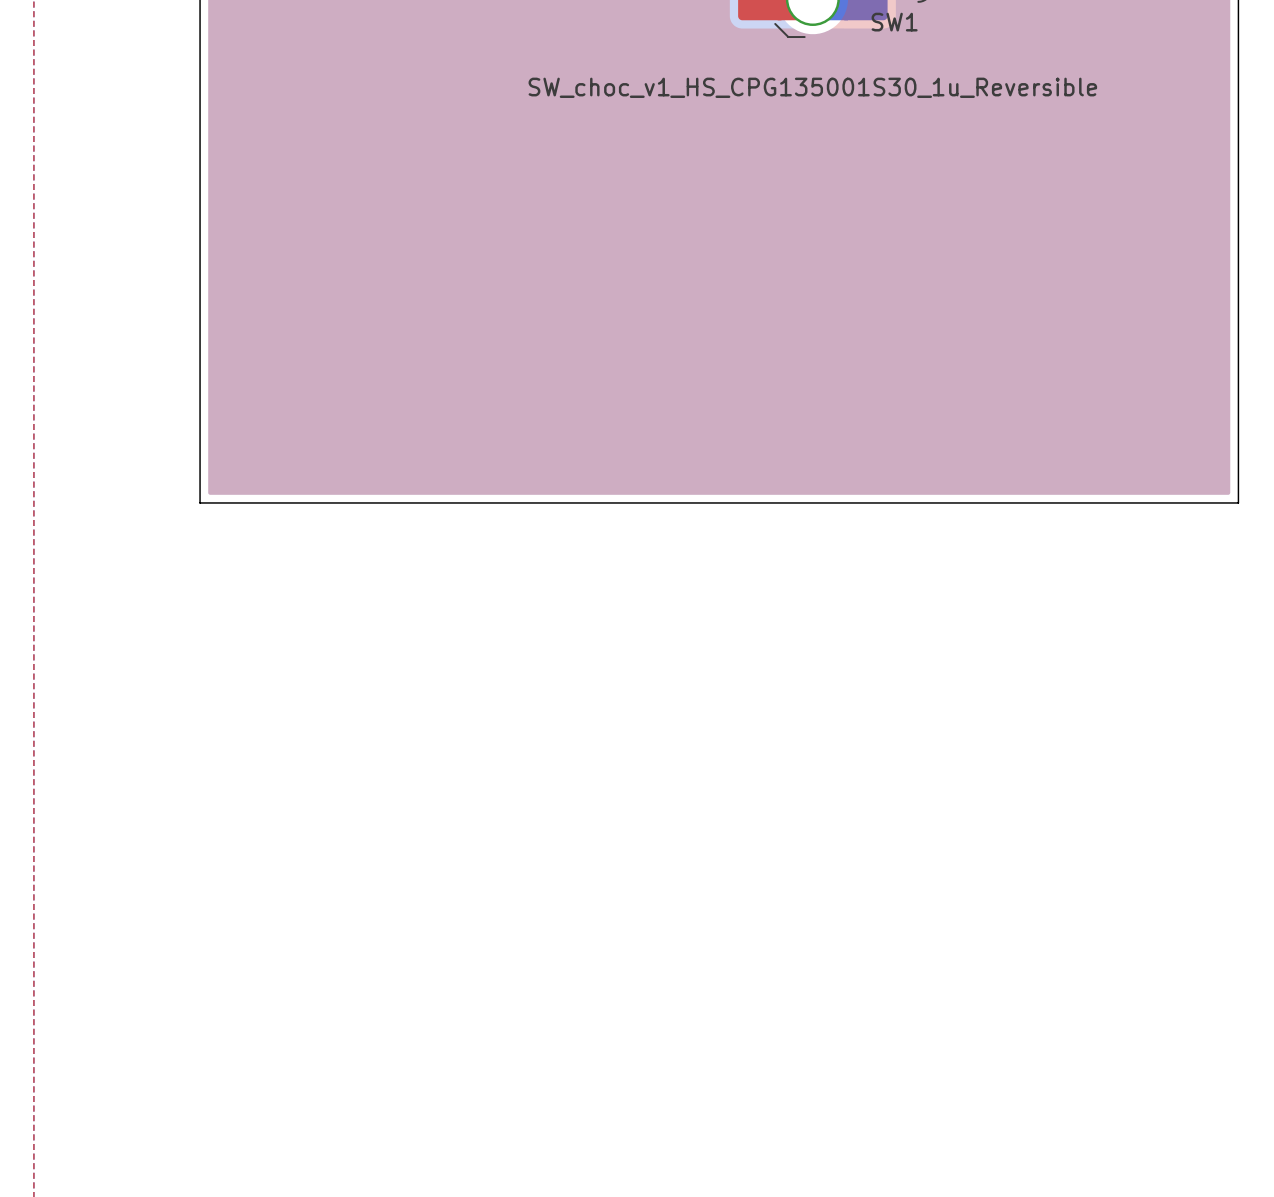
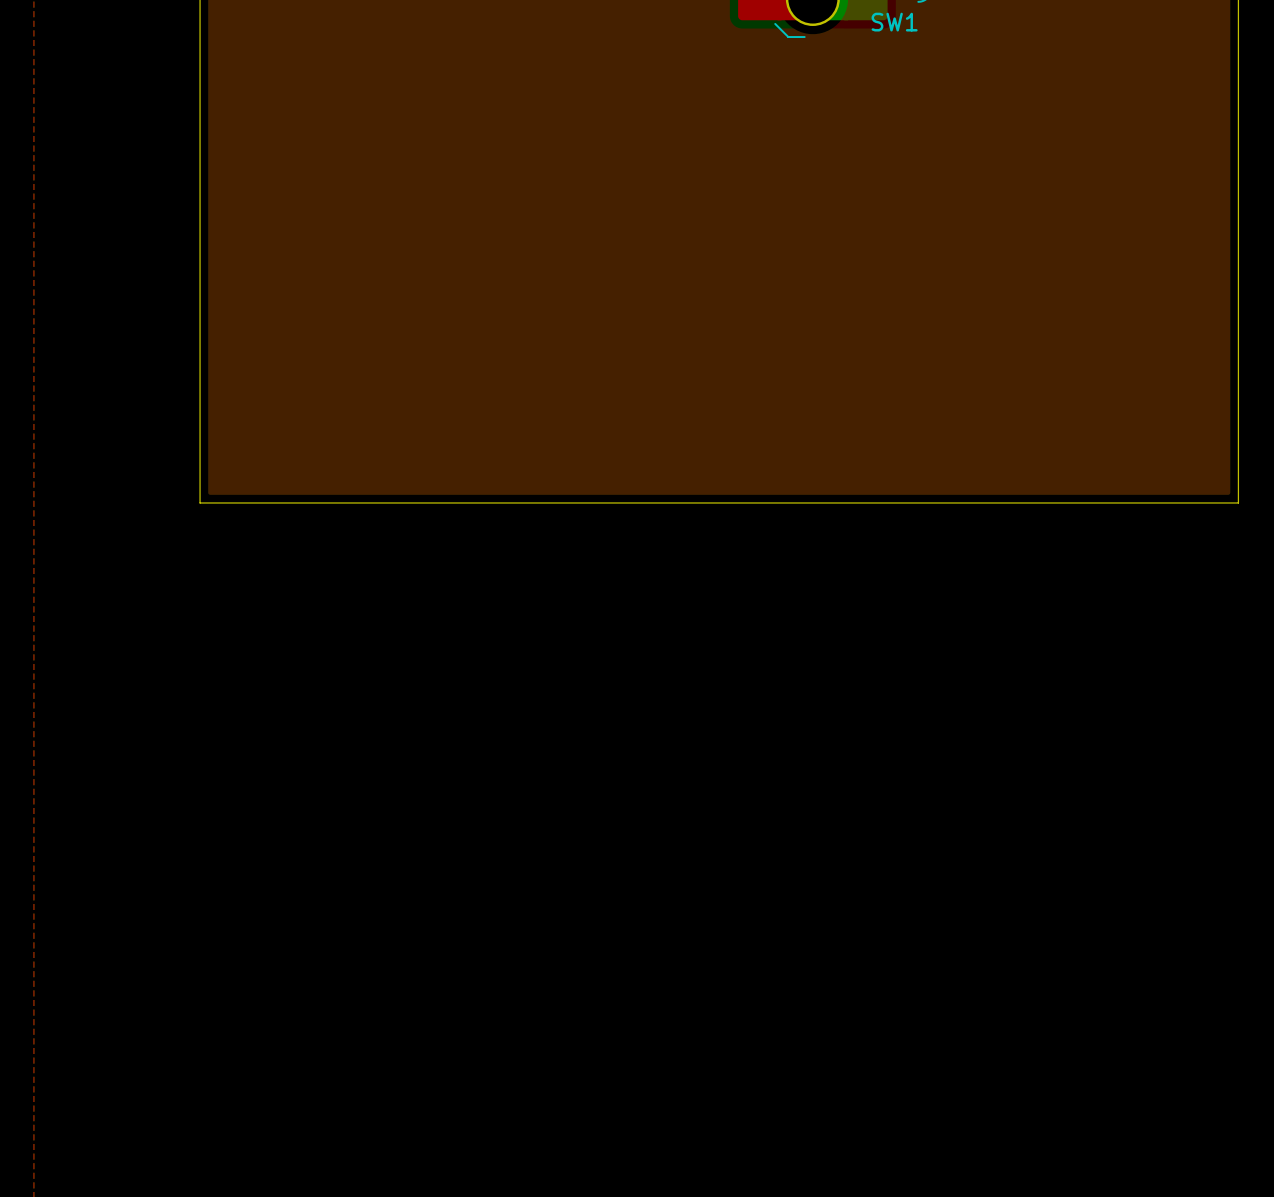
SW1 value: SW_choc_v1_HS_CPG135001S30_1u_Reversible (812, 87) -> none

